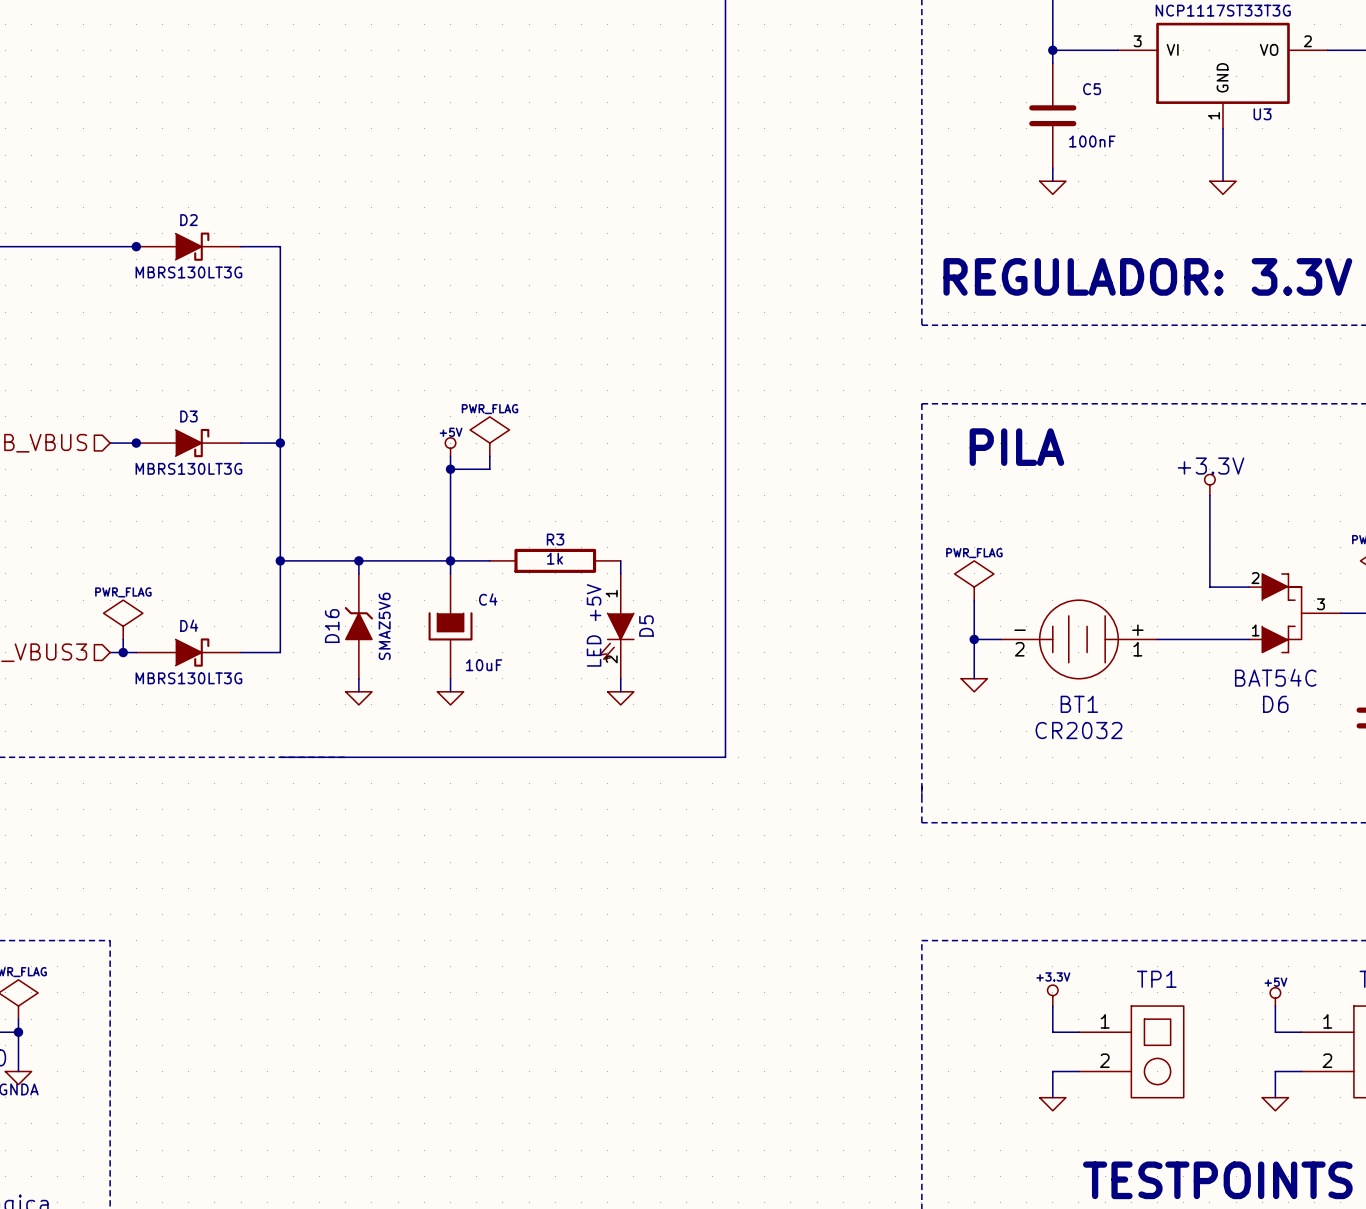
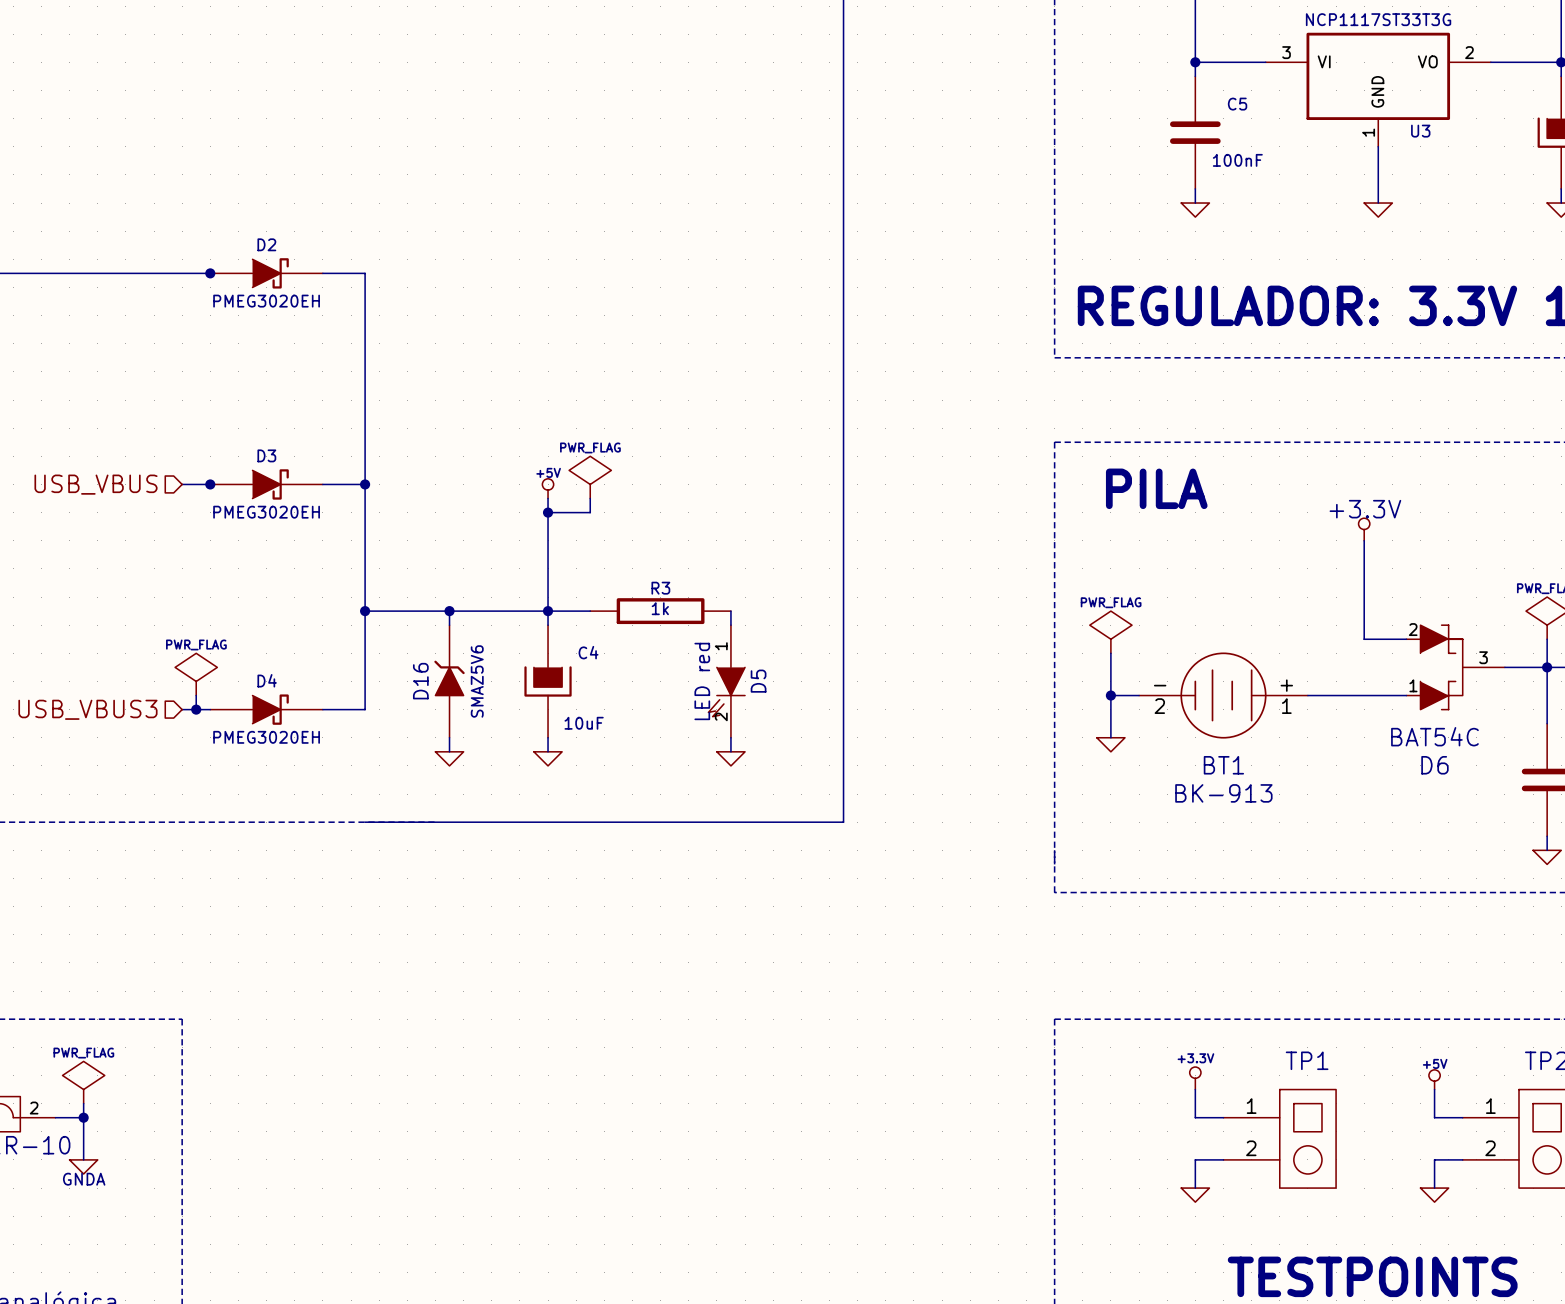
D2 value: MBRS130LT3G (188, 272) -> PMEG3020EH (266, 301)
D3 value: MBRS130LT3G (188, 468) -> PMEG3020EH (266, 512)
D5 value: LED +5V (594, 625) -> LED red (702, 681)
D4 value: MBRS130LT3G (188, 678) -> PMEG3020EH (266, 737)
BT1 value: CR2032 (1078, 730) -> BK-913 (1223, 793)

